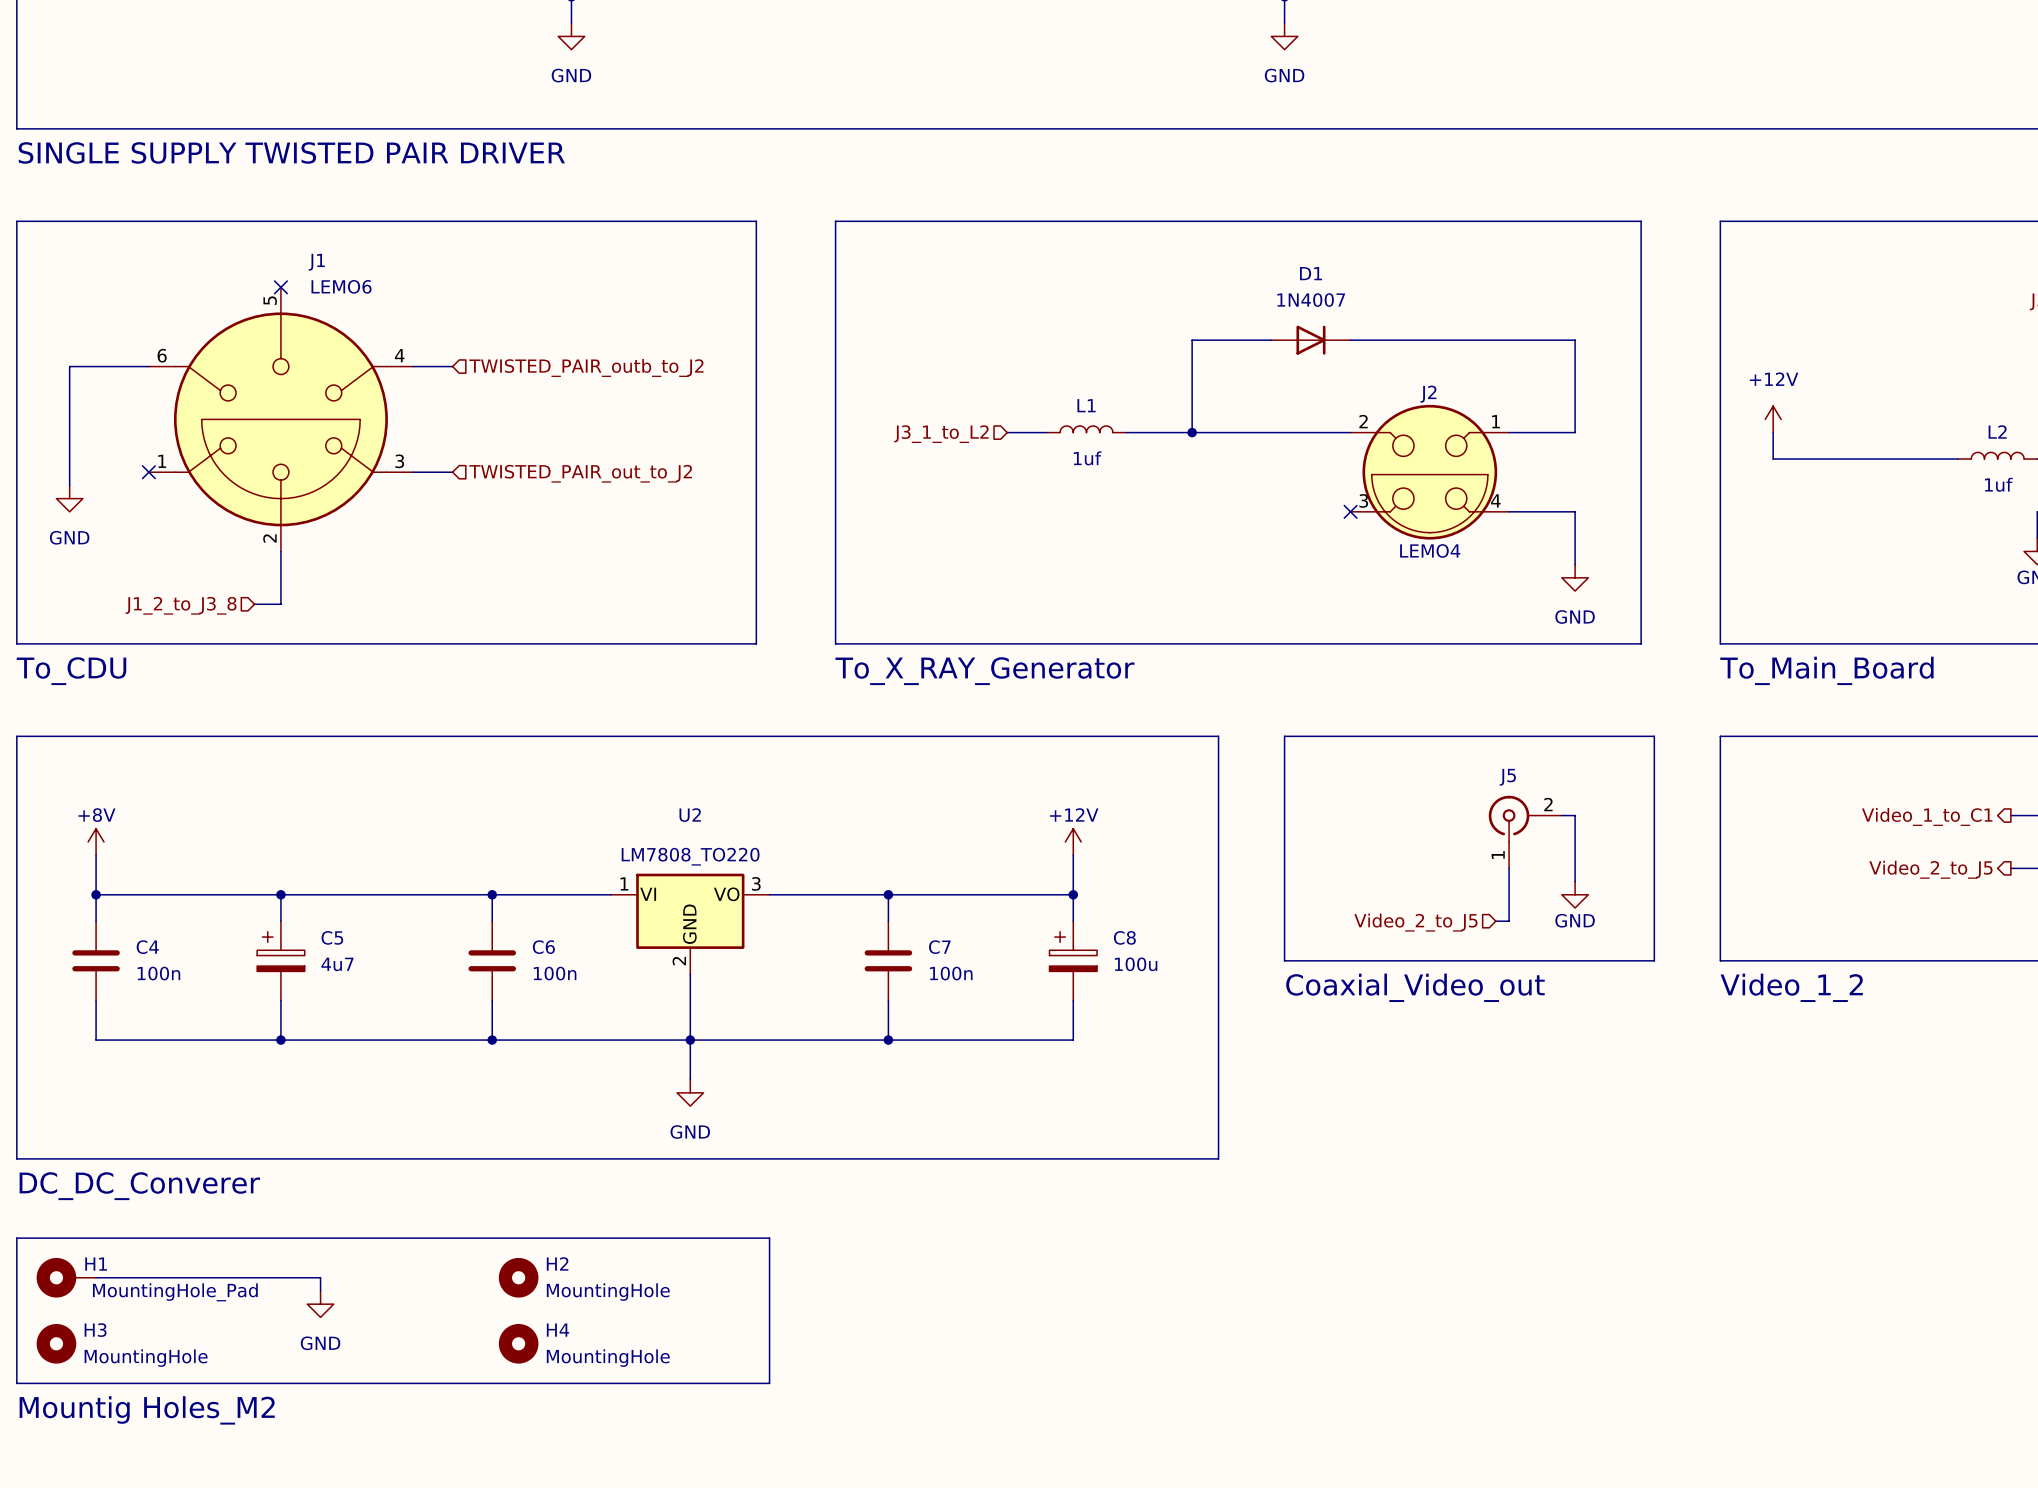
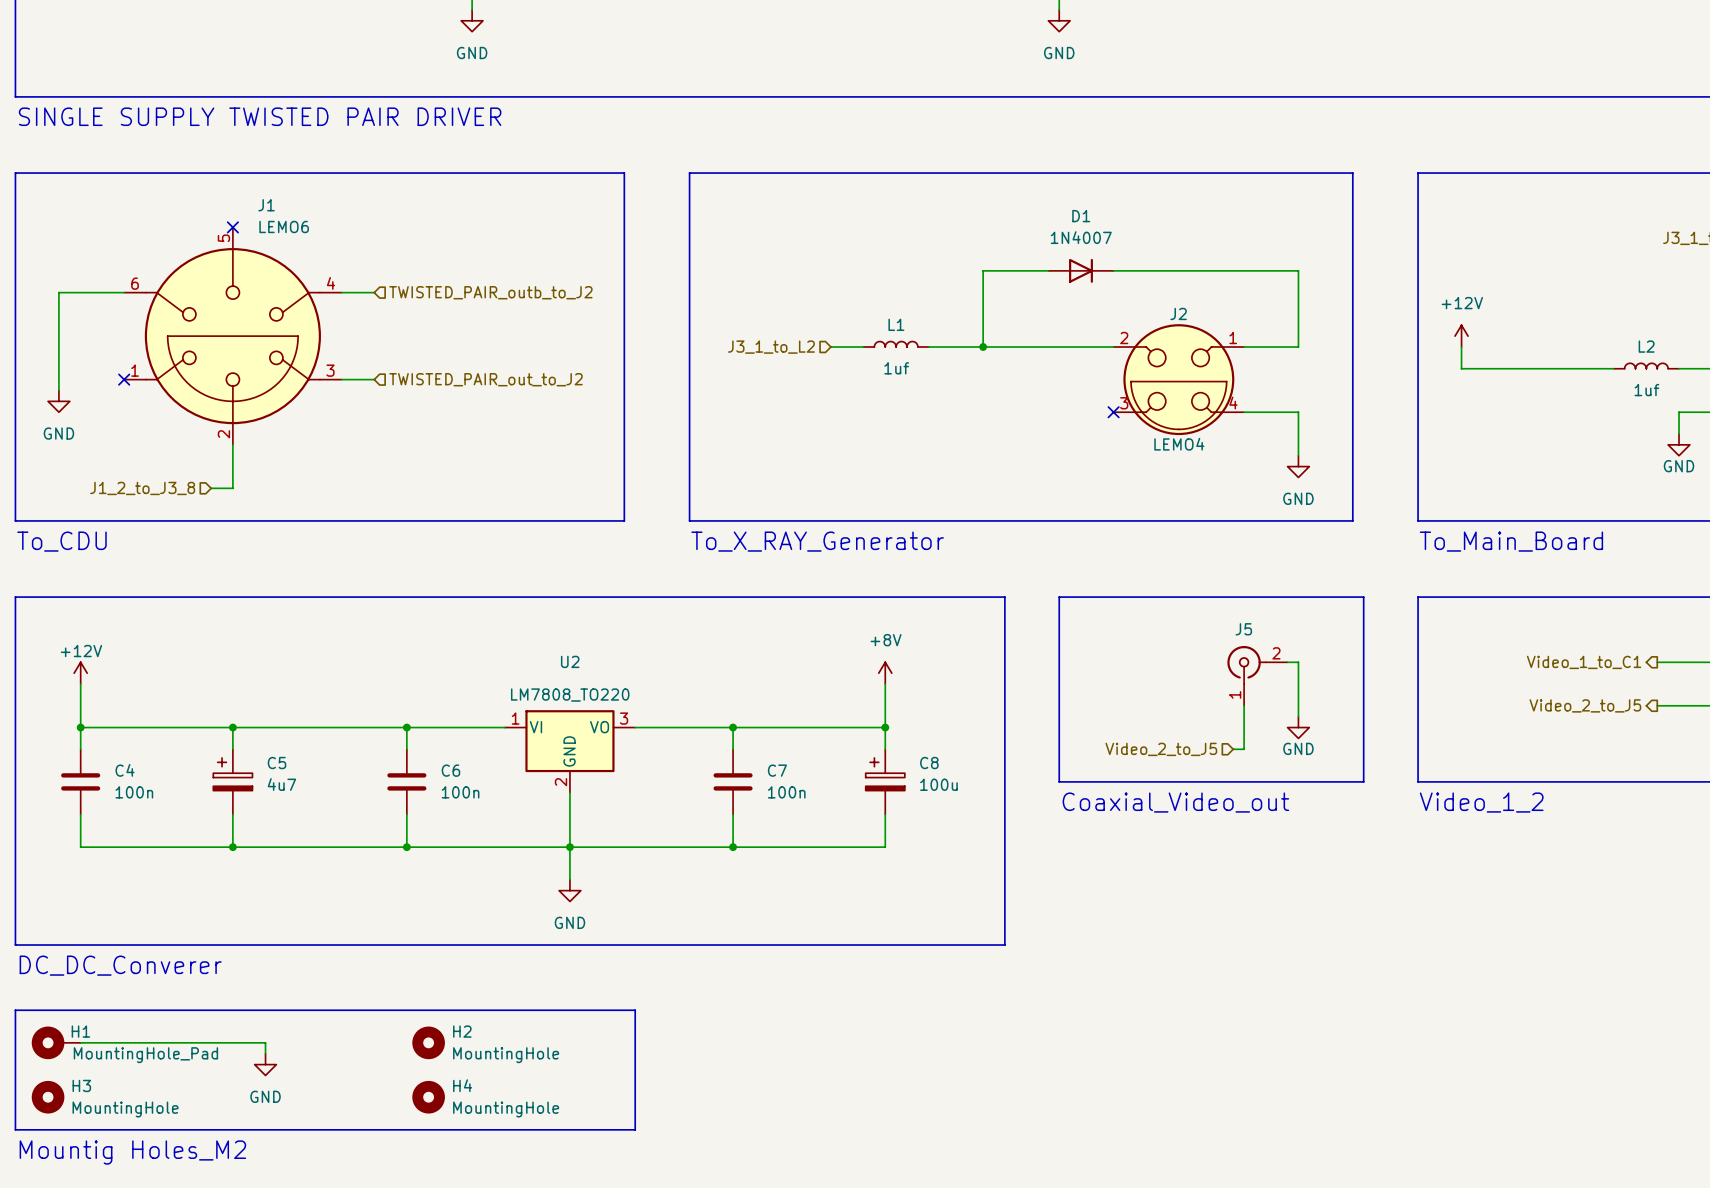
power symbol: none -> +12V (80, 673)
power symbol: none -> +8V (885, 673)
power symbol: +8V (96, 841) -> none
power symbol: +12V (1073, 841) -> none

